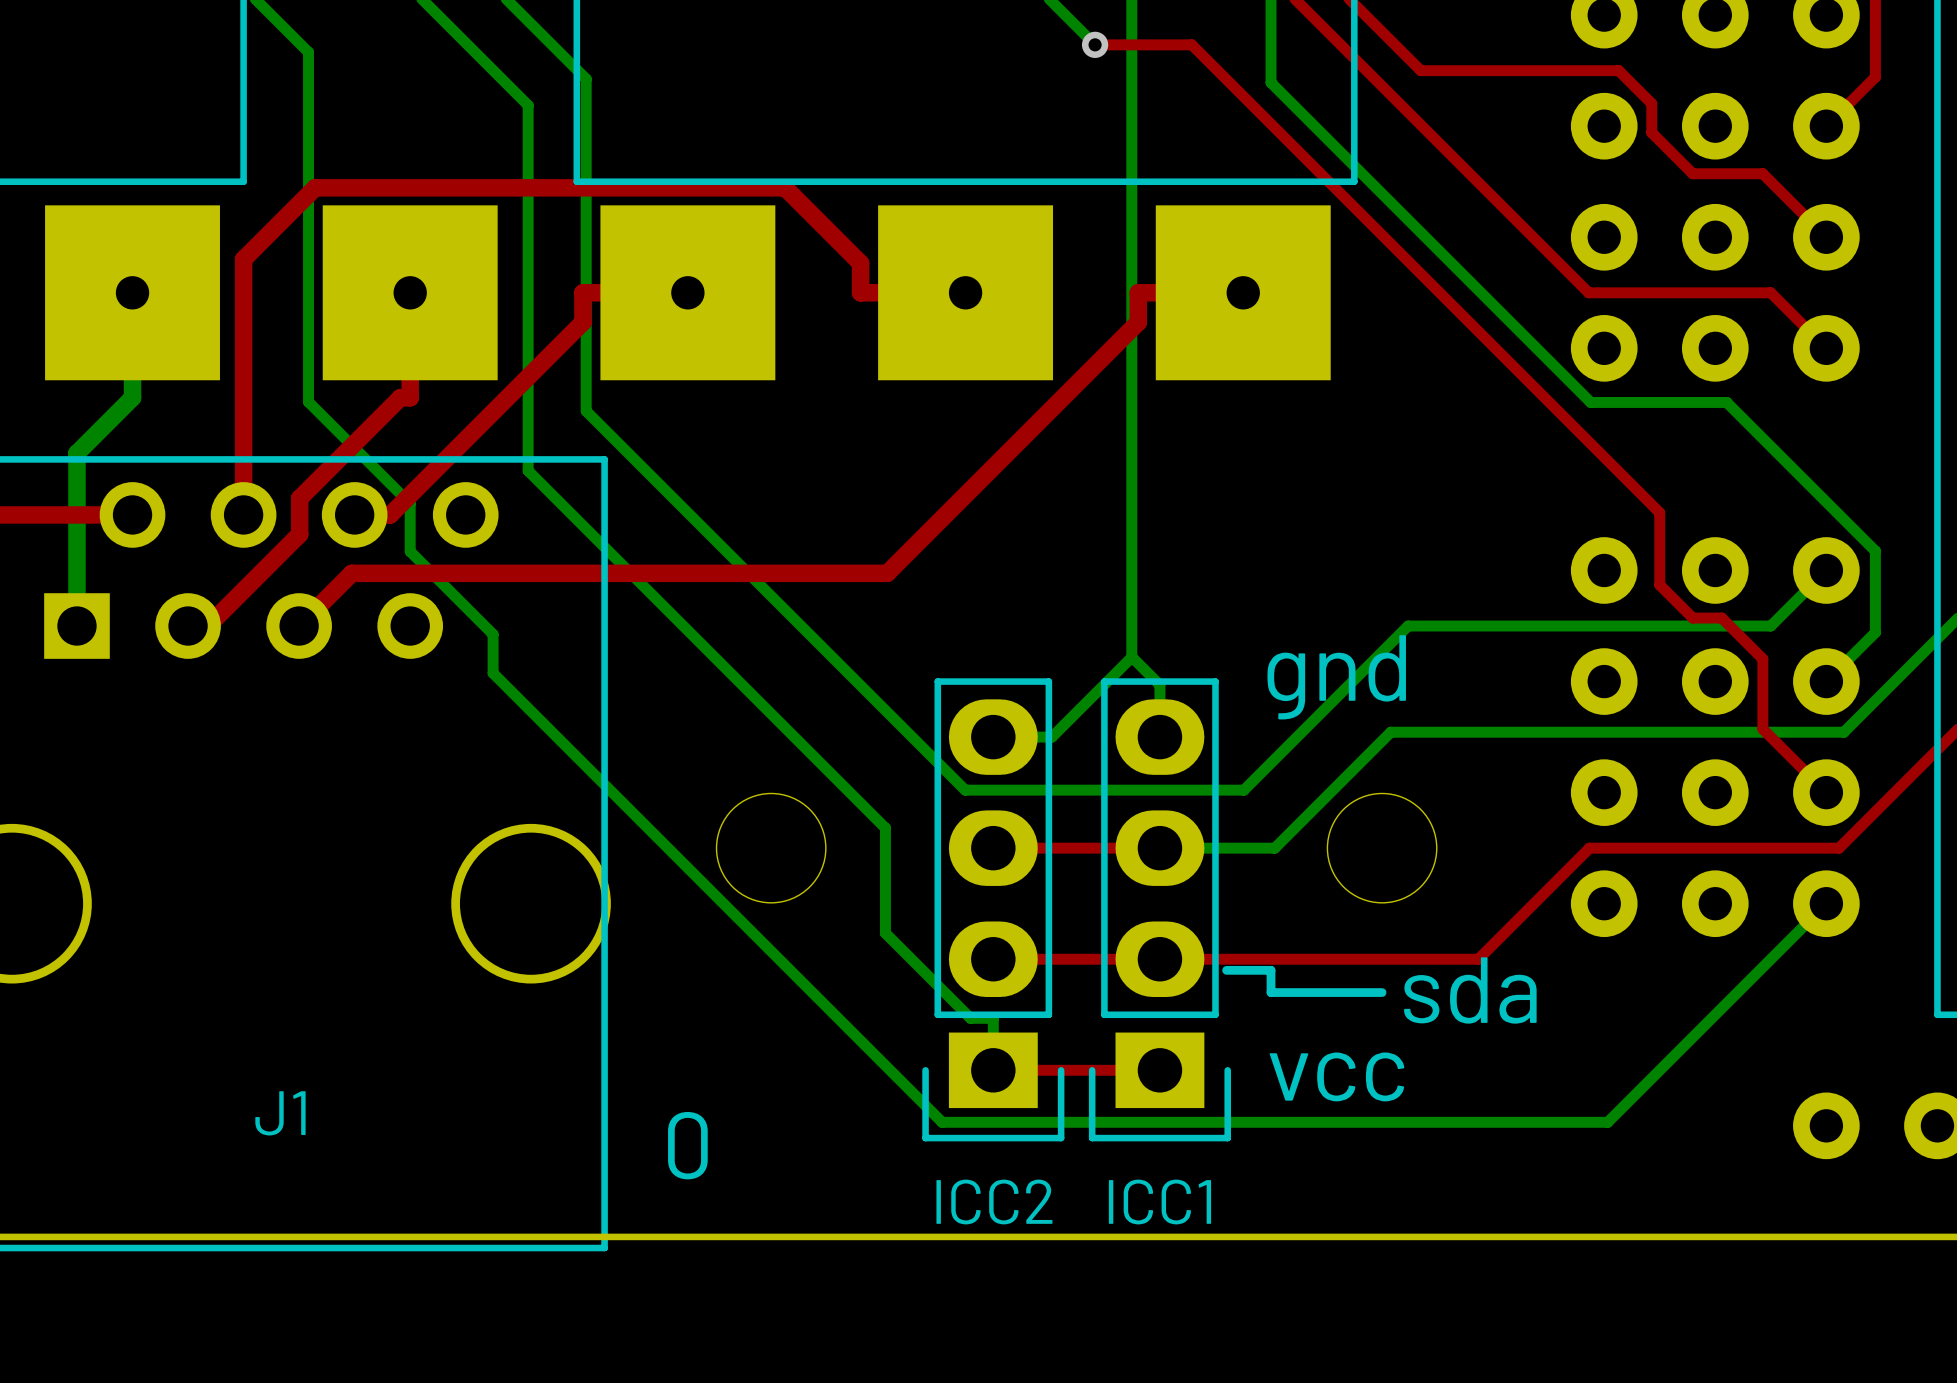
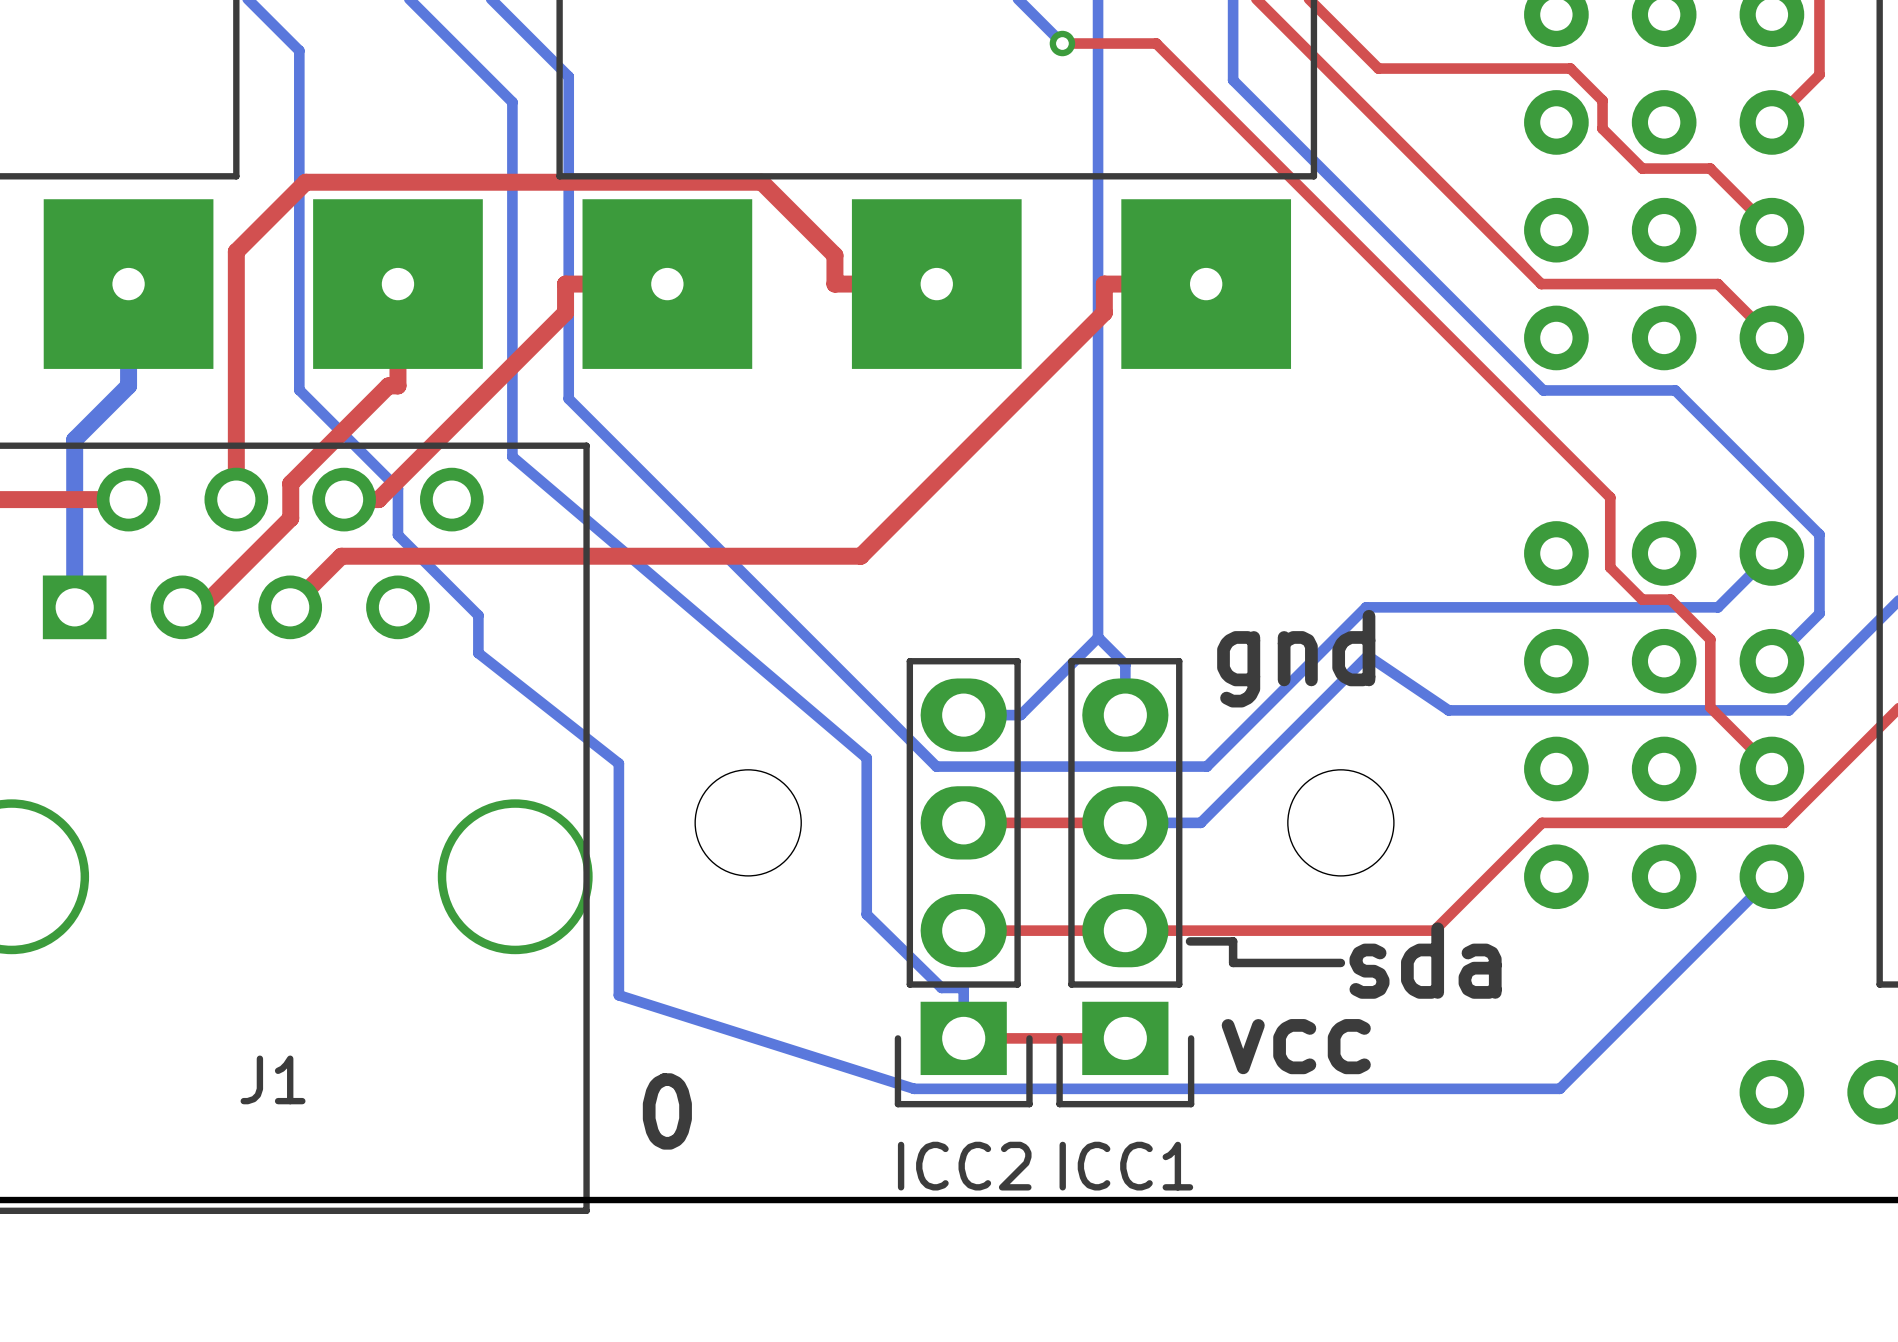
bottom track: (528, 470) (885, 828) (885, 933) (970, 1018) -> (512, 456) (866, 758) (866, 914) (941, 987)
bottom track: (493, 673) (942, 1122) -> (478, 653) (618, 763) (618, 995) (914, 1088)
bottom track: (1493, 732) (1390, 732) (1274, 848) (1237, 848) -> (1448, 710) (1367, 655) (1200, 822)

